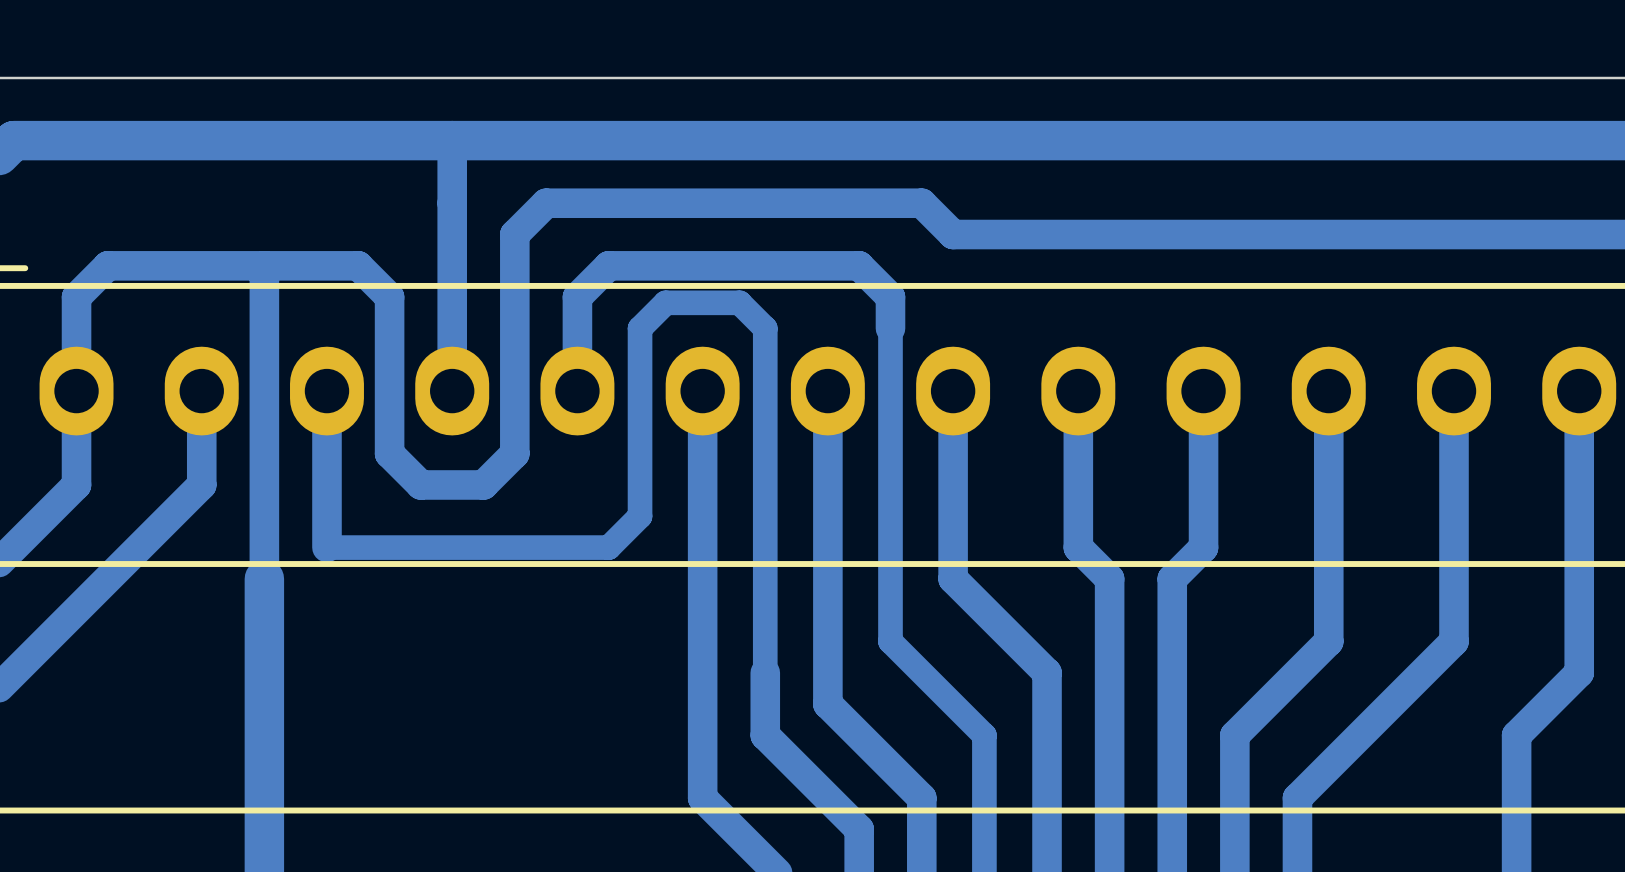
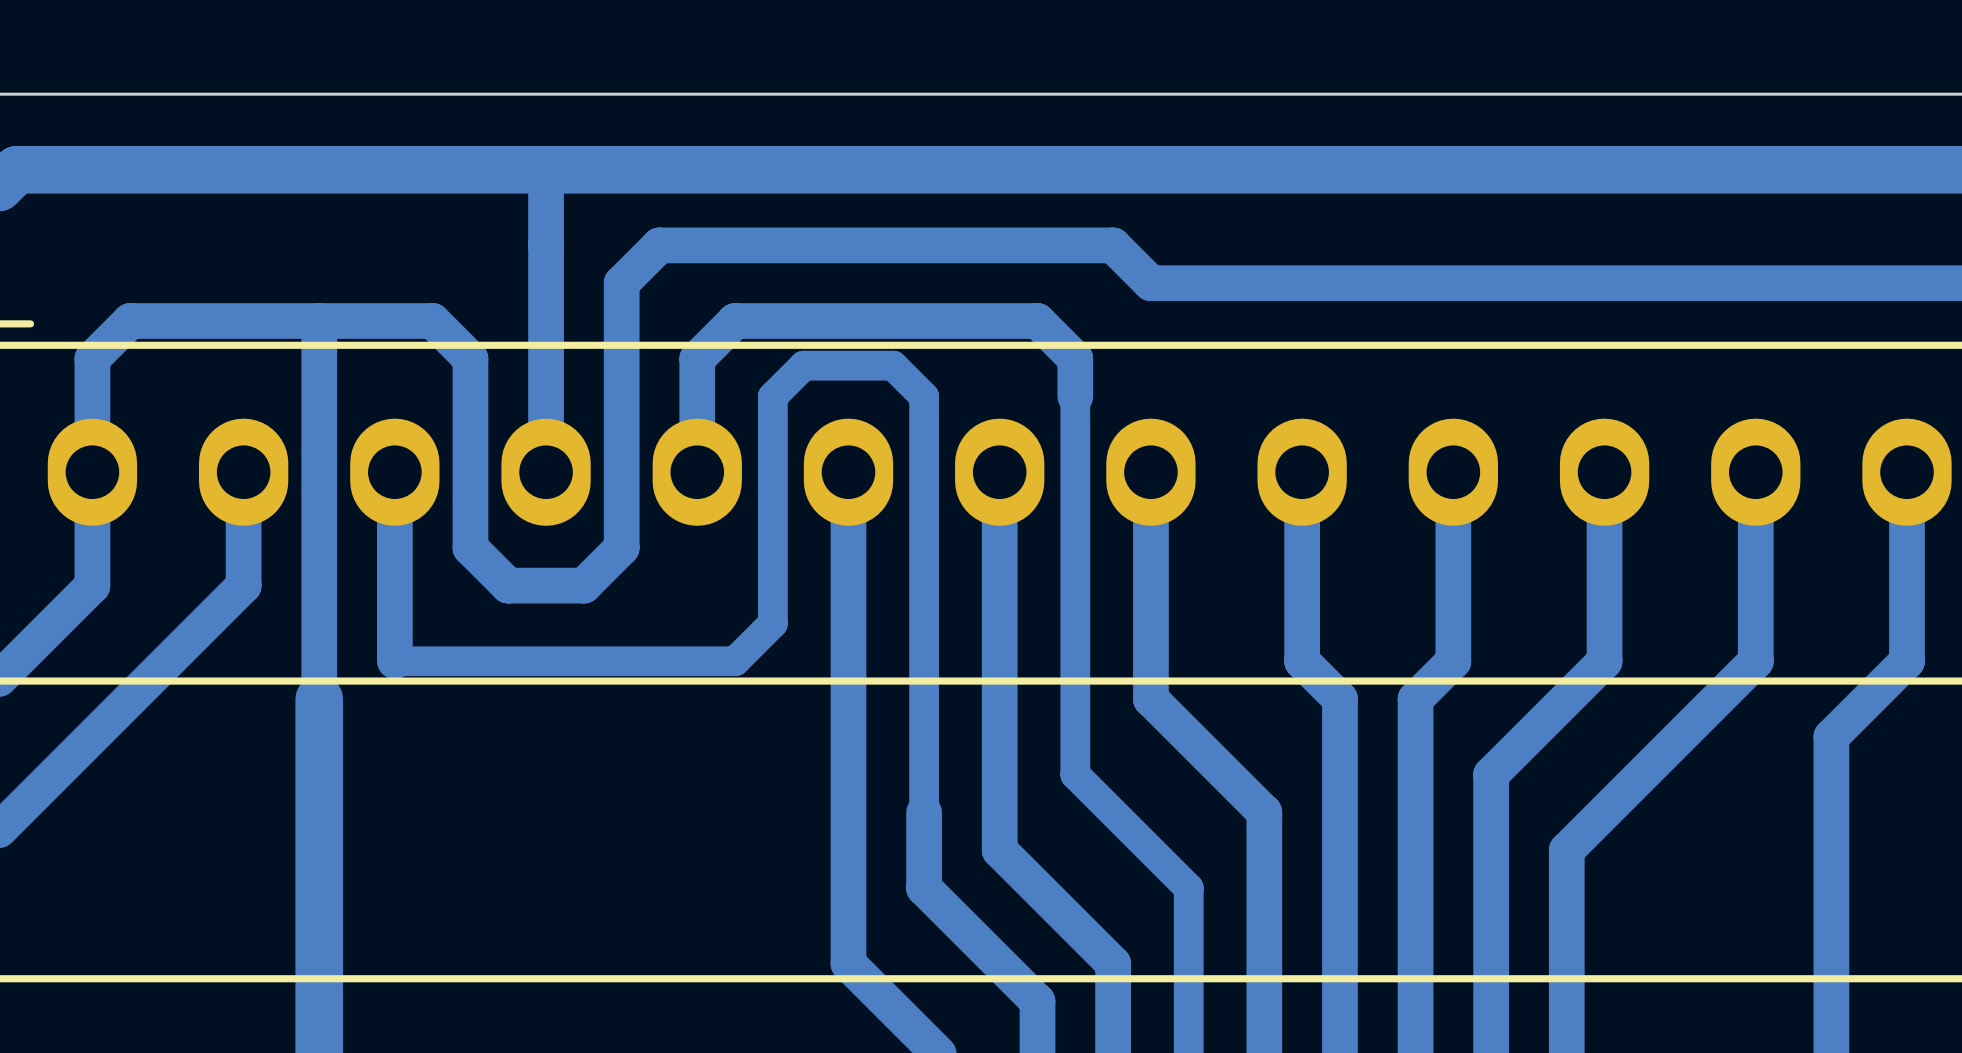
bottom track: (1328, 547) (1328, 641) (1234, 735) -> (1604, 661) (1491, 774) (1491, 888)
bottom track: (1454, 547) (1454, 641) (1297, 798) -> (1755, 661) (1566, 850) (1566, 963)
bottom track: (1579, 547) (1579, 672) (1516, 735) -> (1906, 661) (1831, 736) (1831, 888)

